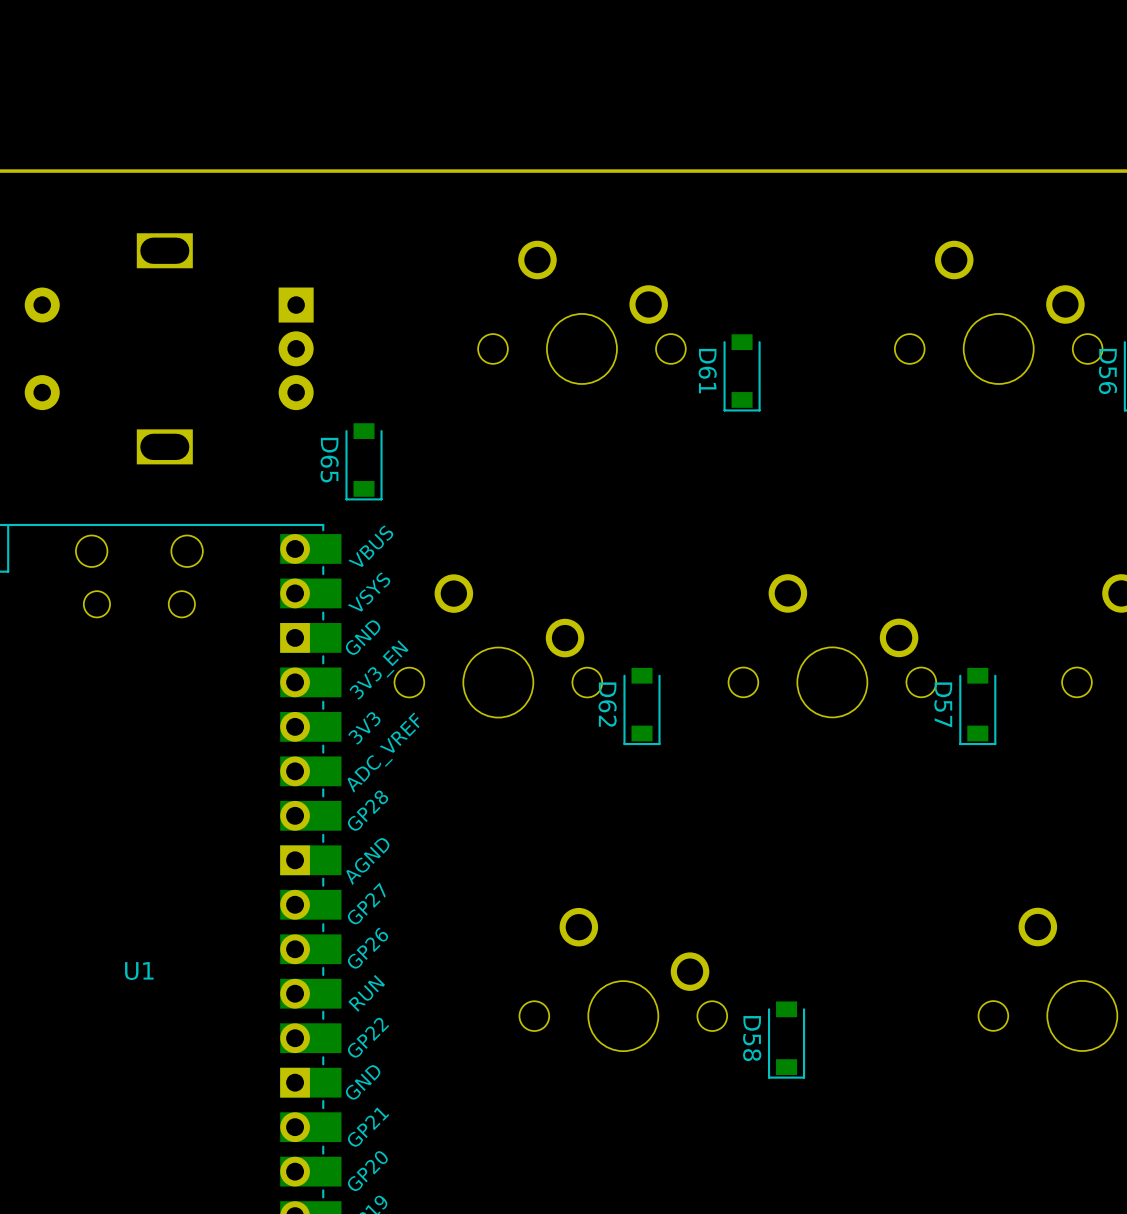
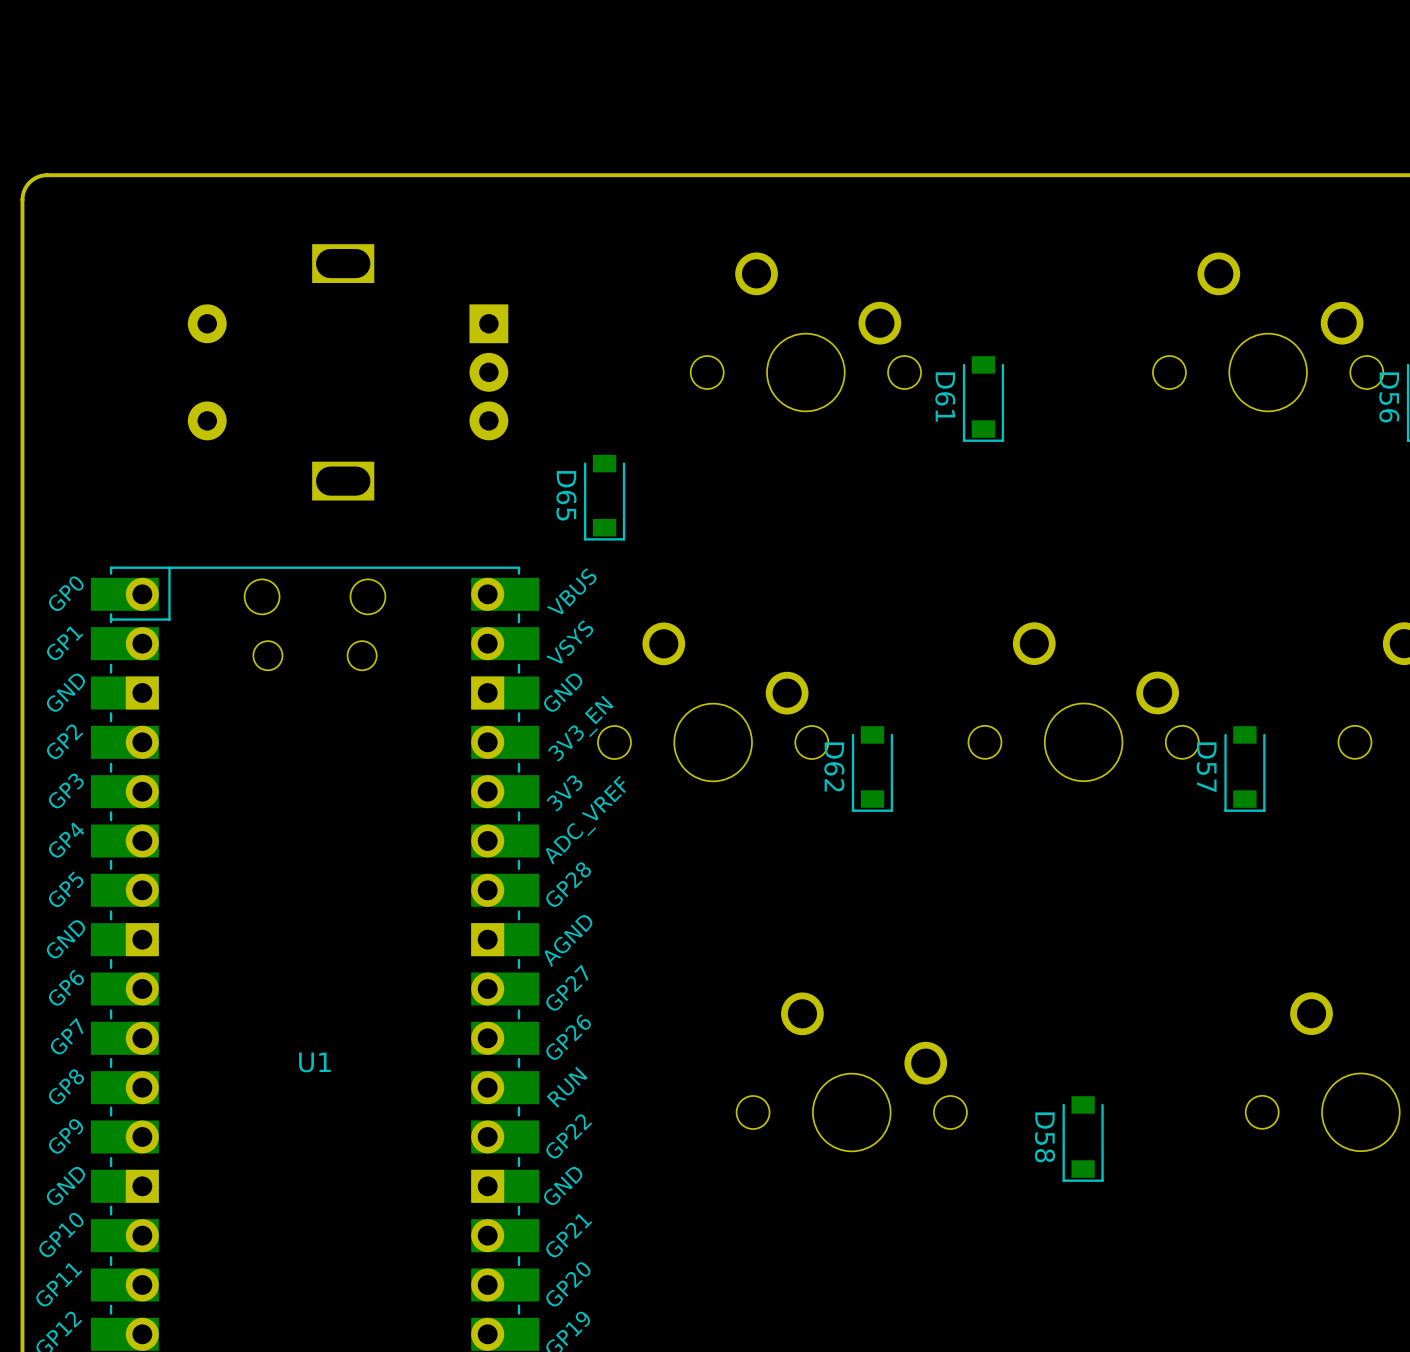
D65 position: (364, 461) -> (604, 497)
D58 position: (786, 1040) -> (1083, 1139)

